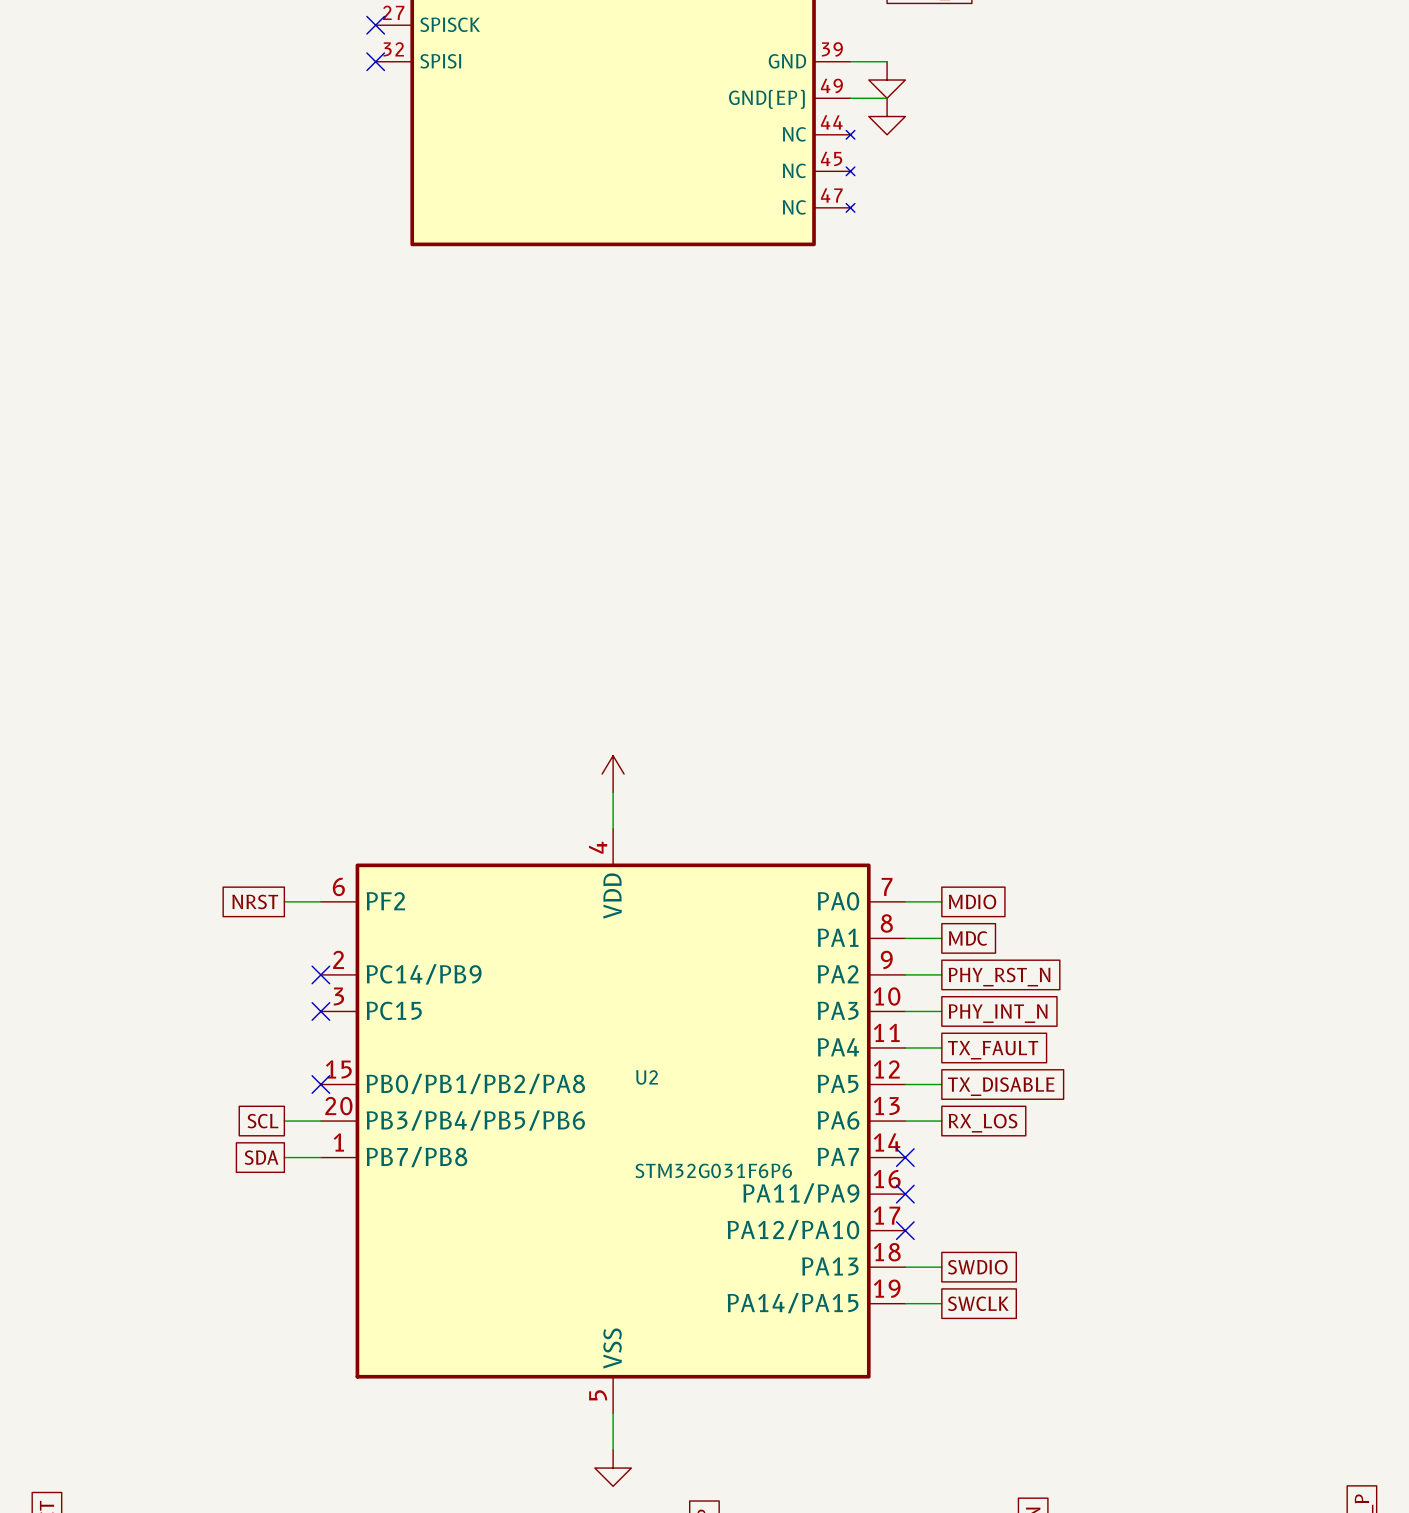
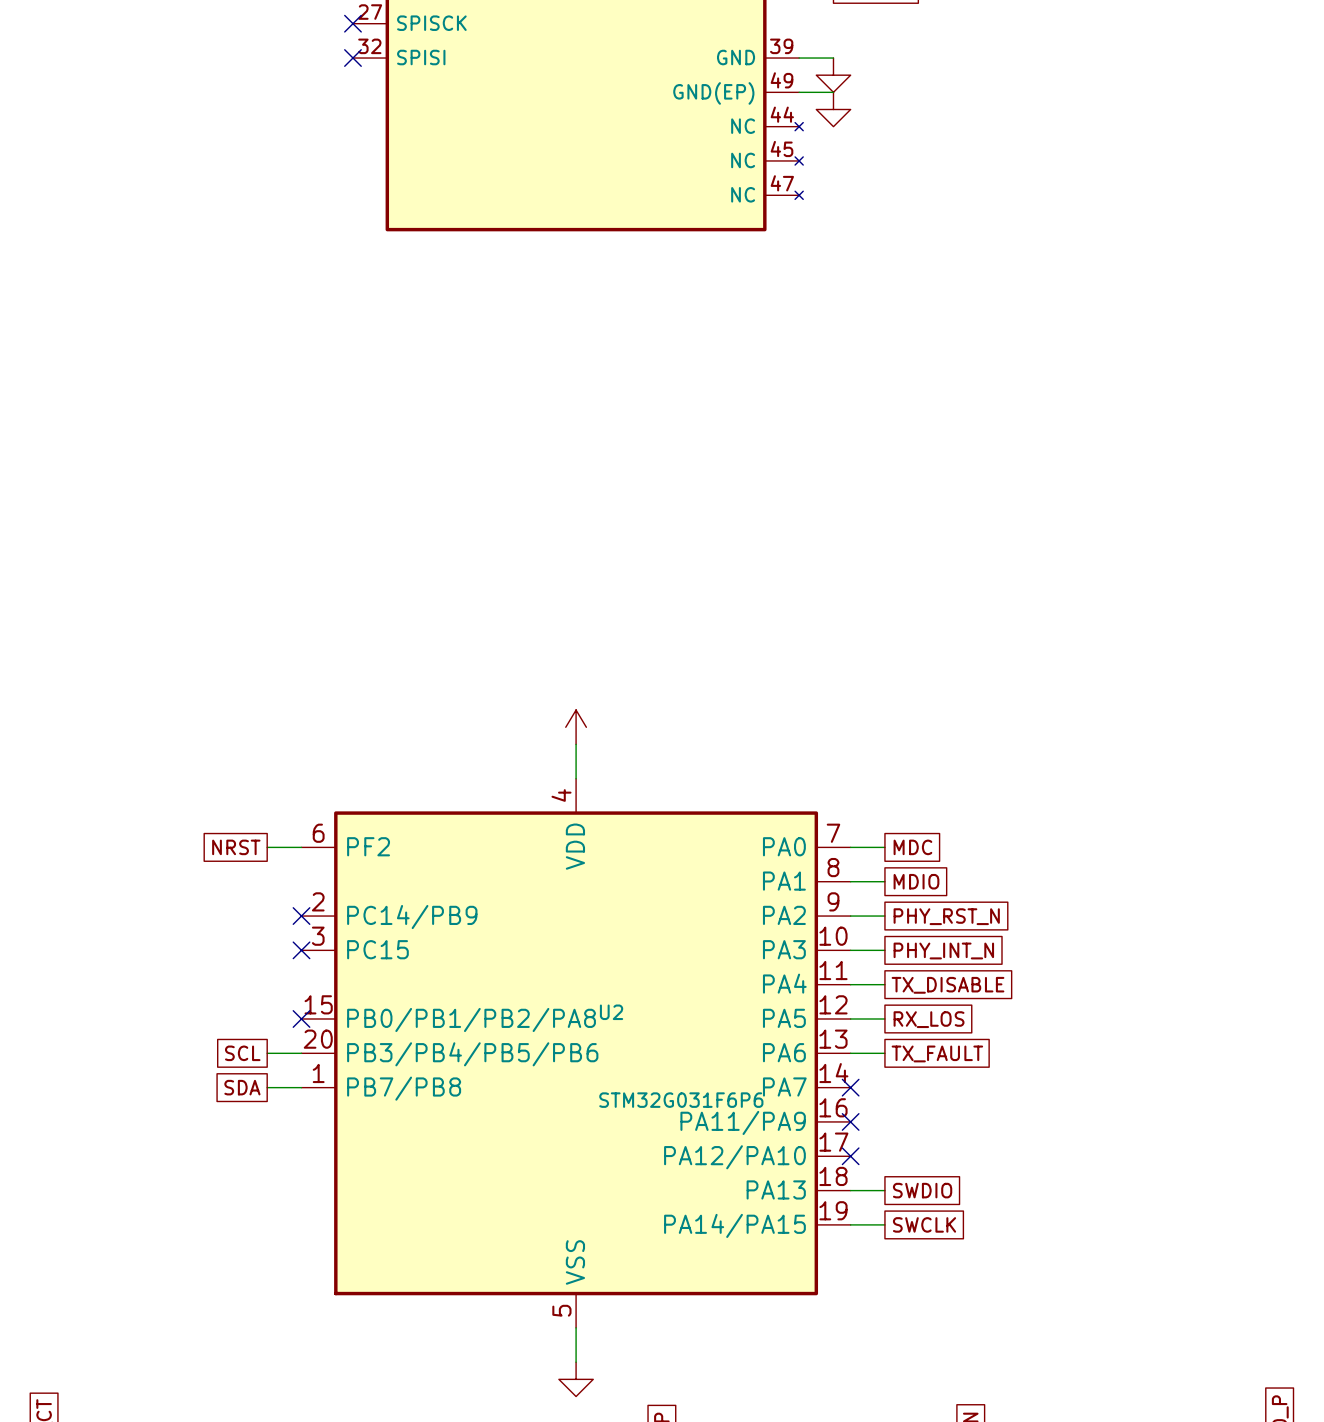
global label: MDIO (972, 901) -> MDC (912, 847)
global label: MDC (968, 938) -> MDIO (916, 881)
global label: TX_FAULT (993, 1050) -> TX_DISABLE (948, 985)
global label: TX_DISABLE (1001, 1086) -> RX_LOS (929, 1019)
global label: RX_LOS (983, 1123) -> TX_FAULT (937, 1053)

